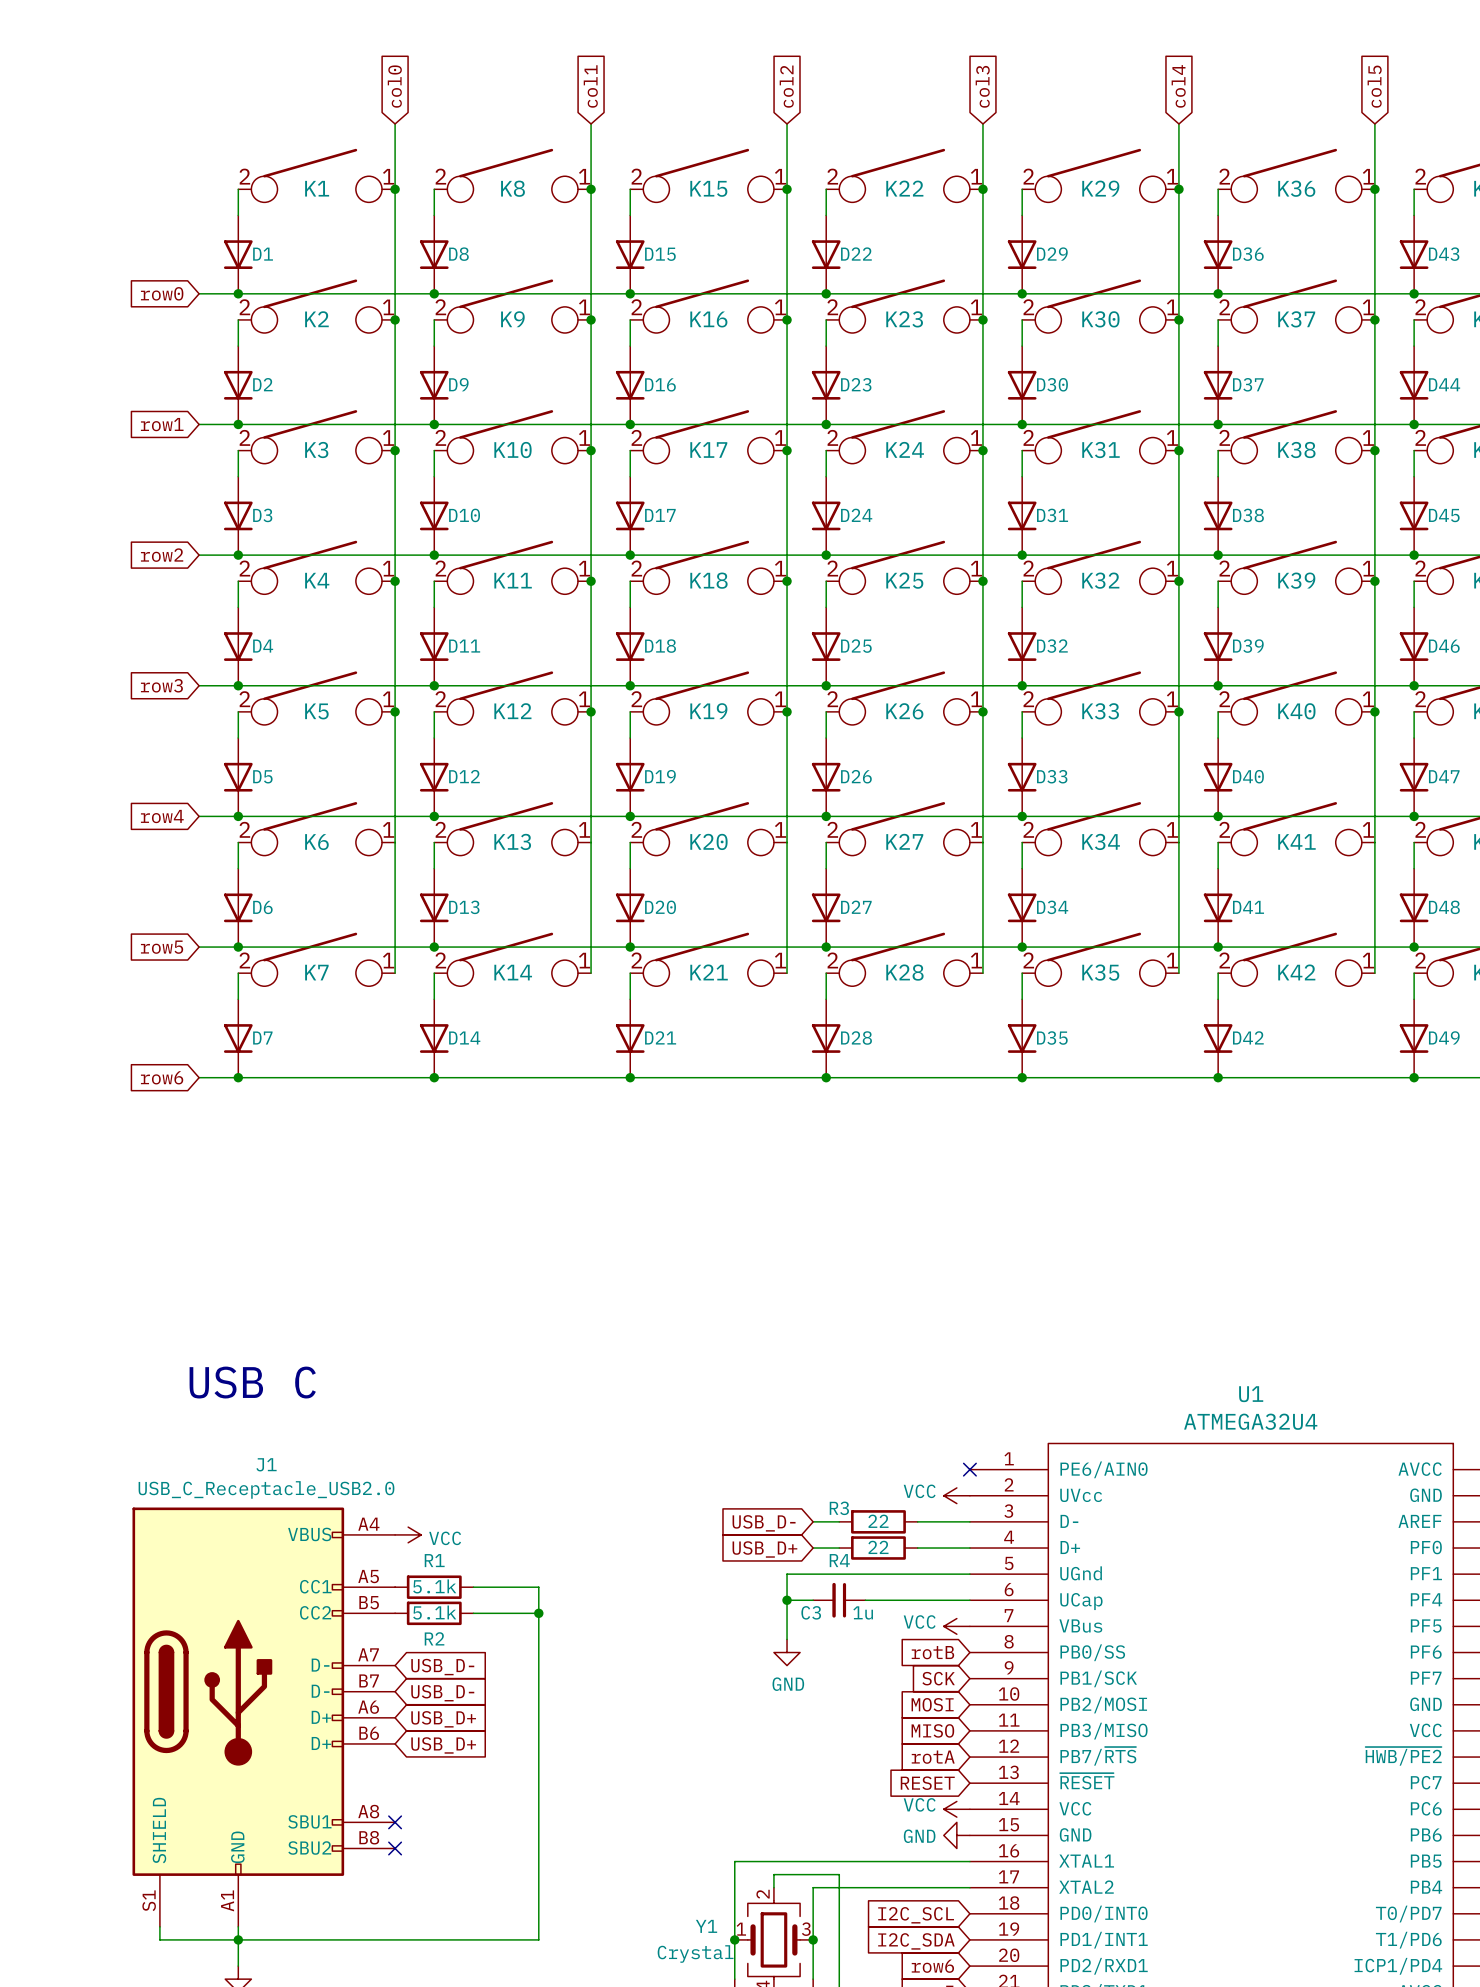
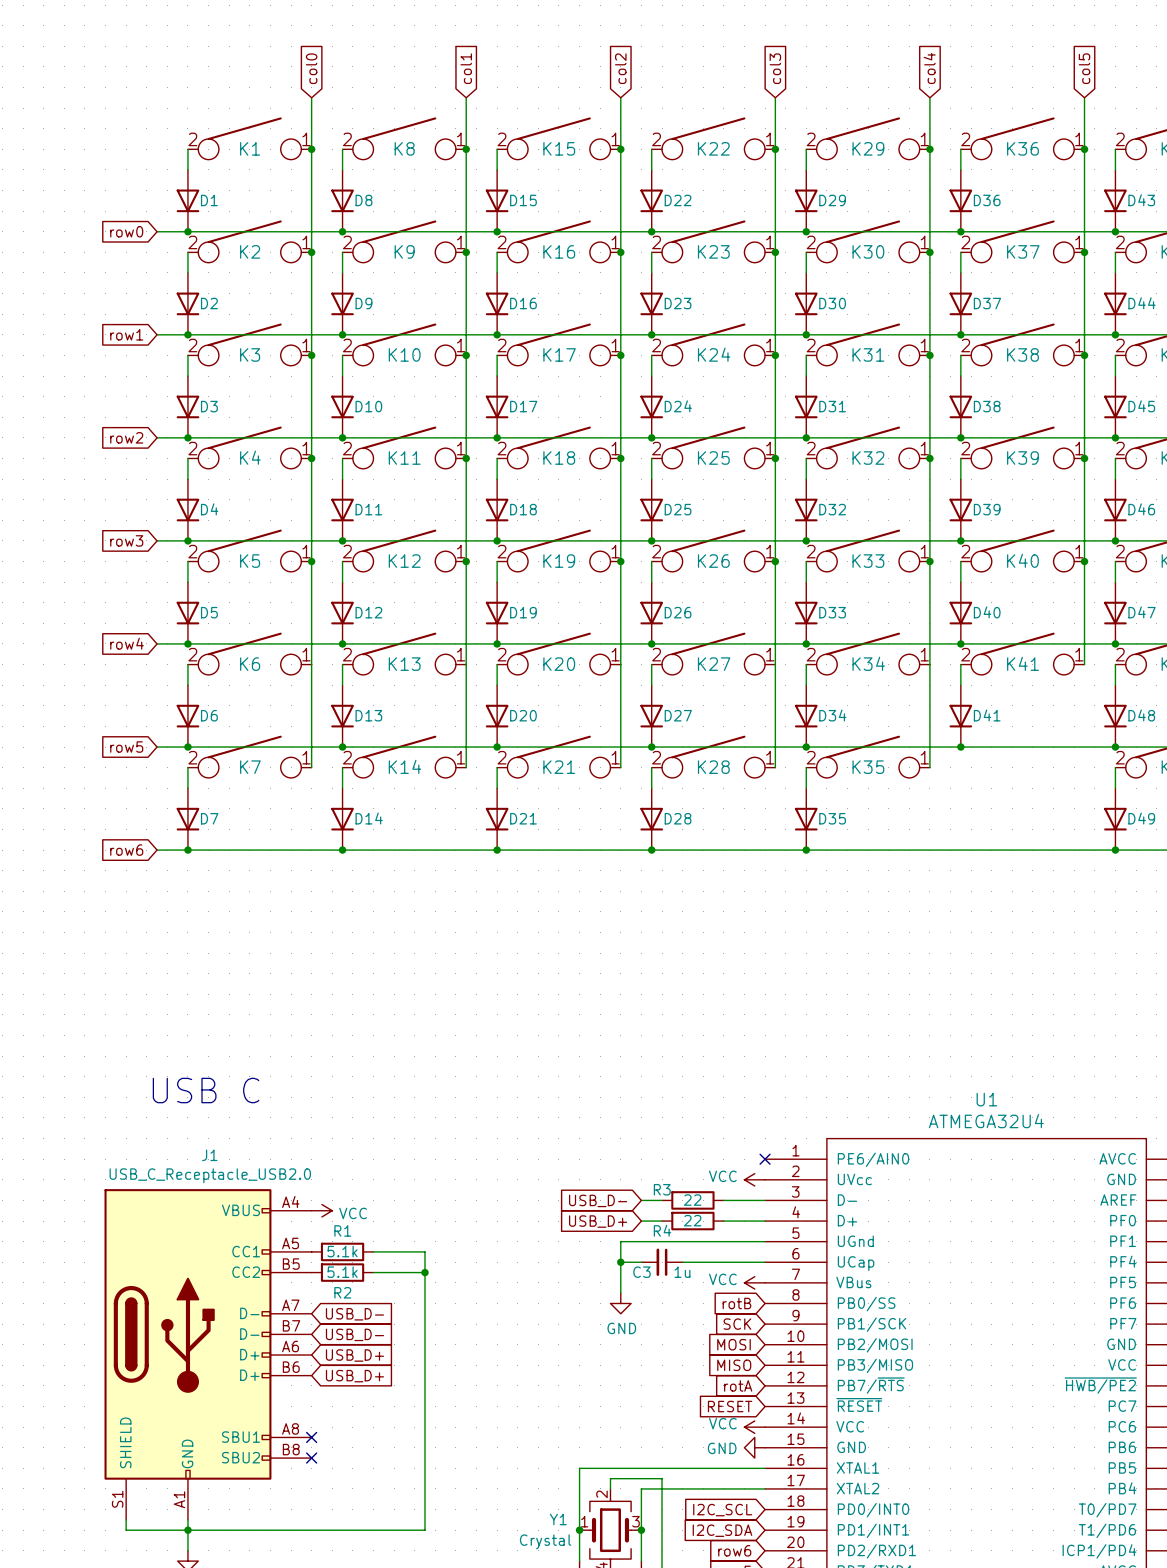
wire: (1374, 842) (1374, 973) -> none
K42: (1296, 959) -> none
wire: (1218, 973) (1218, 999) -> none
D42: (1218, 1038) -> none
junction: (1218, 1077) -> none

